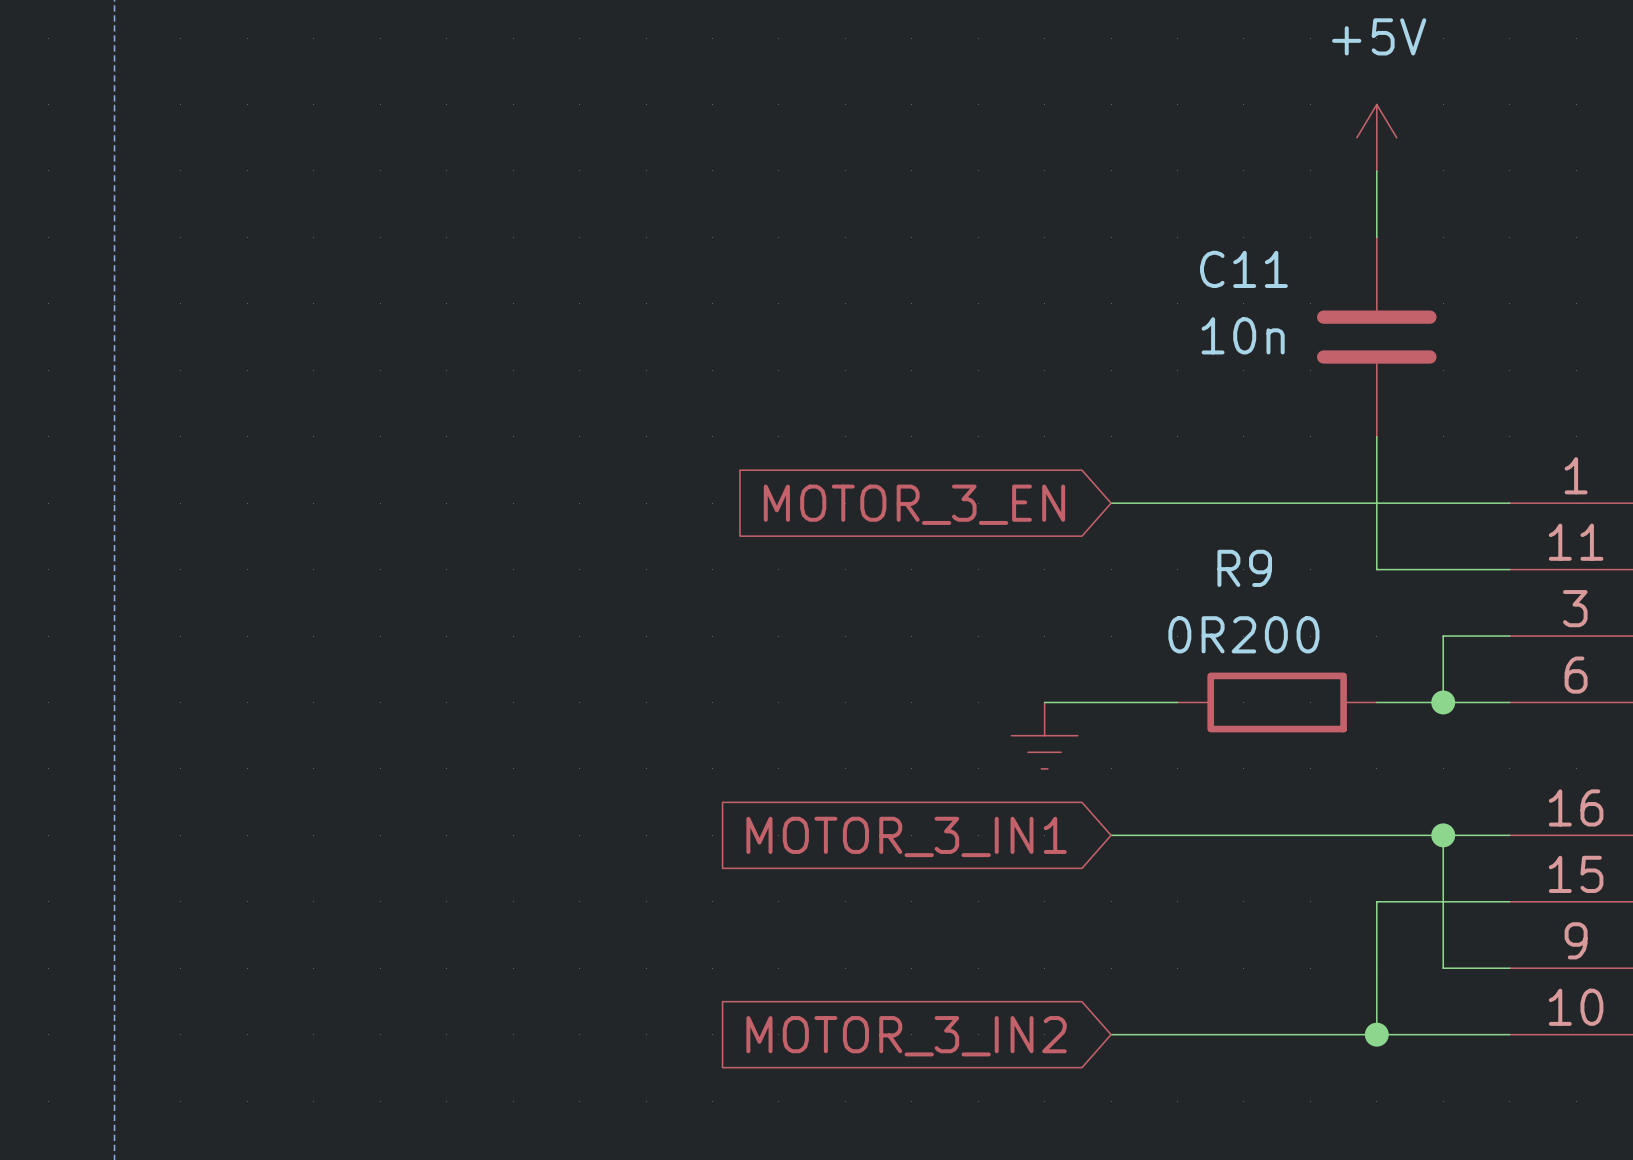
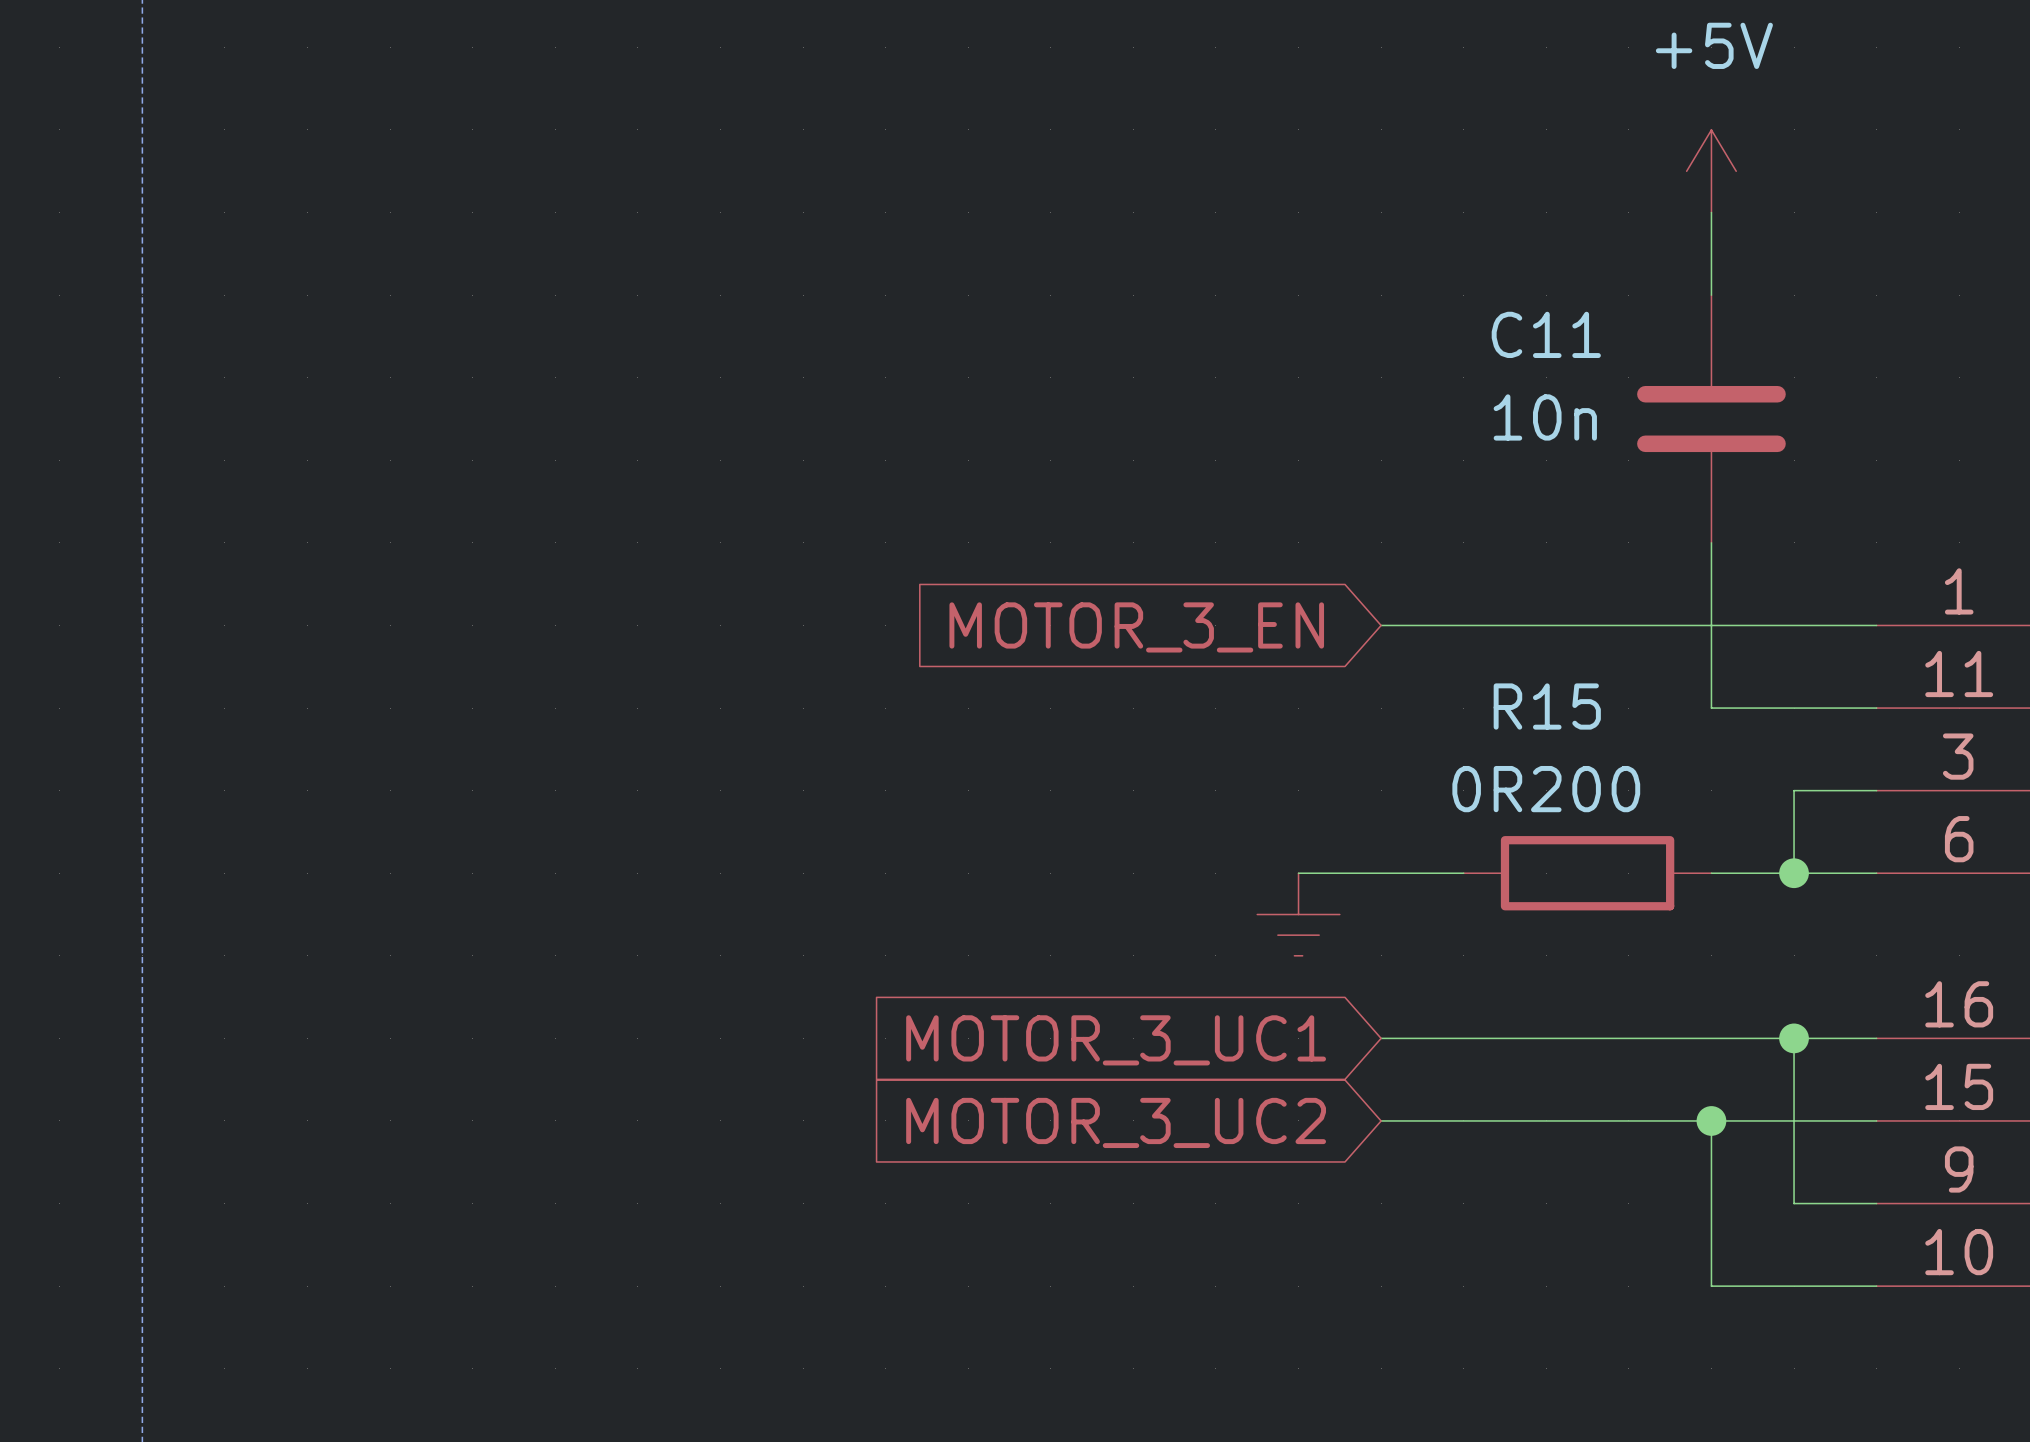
R9 name: R9 (1244, 568) -> R15 (1547, 706)
global label: MOTOR_3_IN1 (906, 836) -> MOTOR_3_UC1 (1116, 1040)
global label: none -> MOTOR_3_UC2 (1116, 1122)
wire: (1111, 1034) (1376, 1034) -> (1381, 1120) (1711, 1120)
junction position: (1376, 1034) -> (1711, 1120)
global label: MOTOR_3_IN2 (906, 1036) -> none

